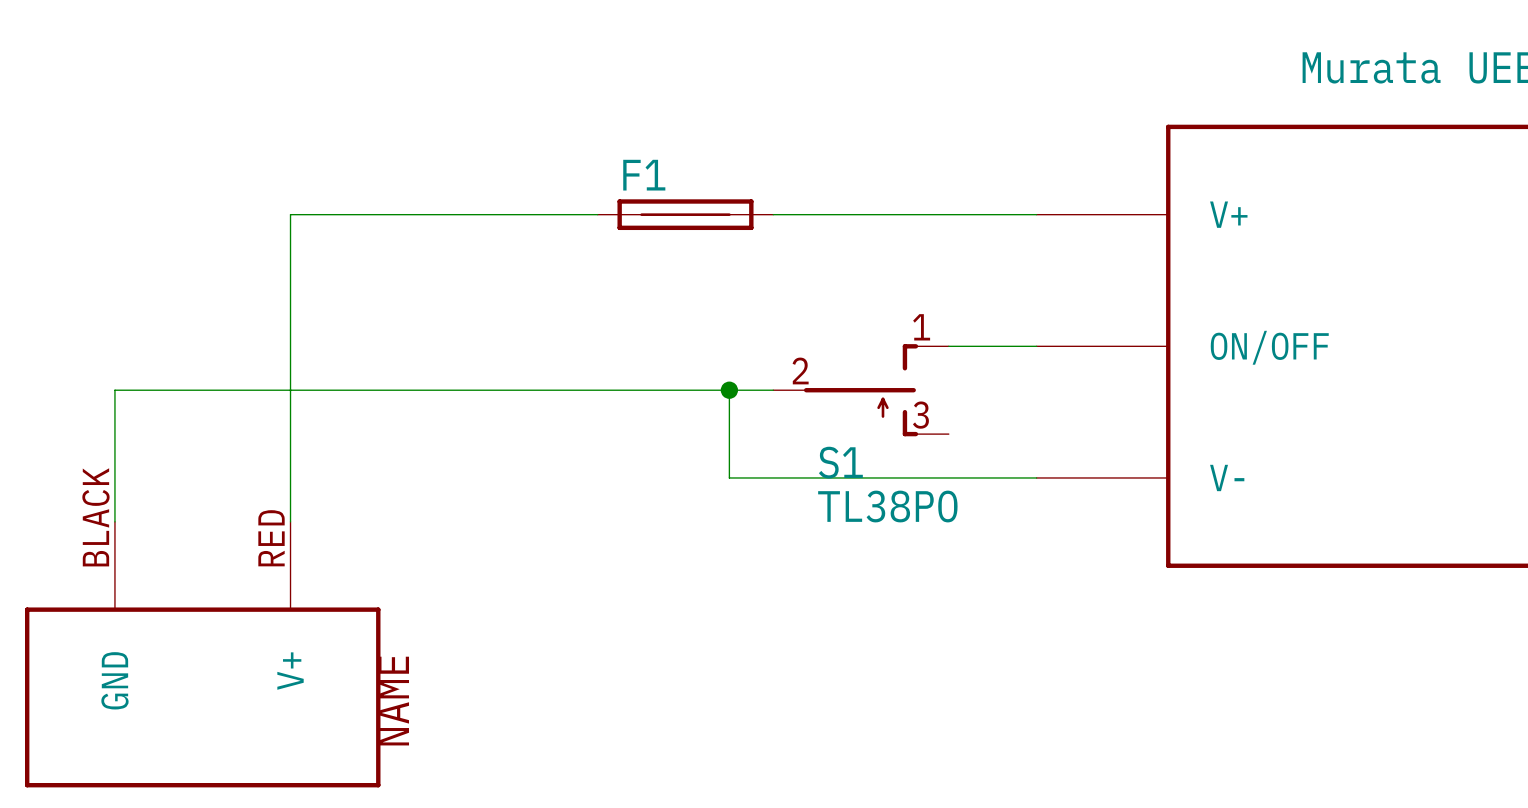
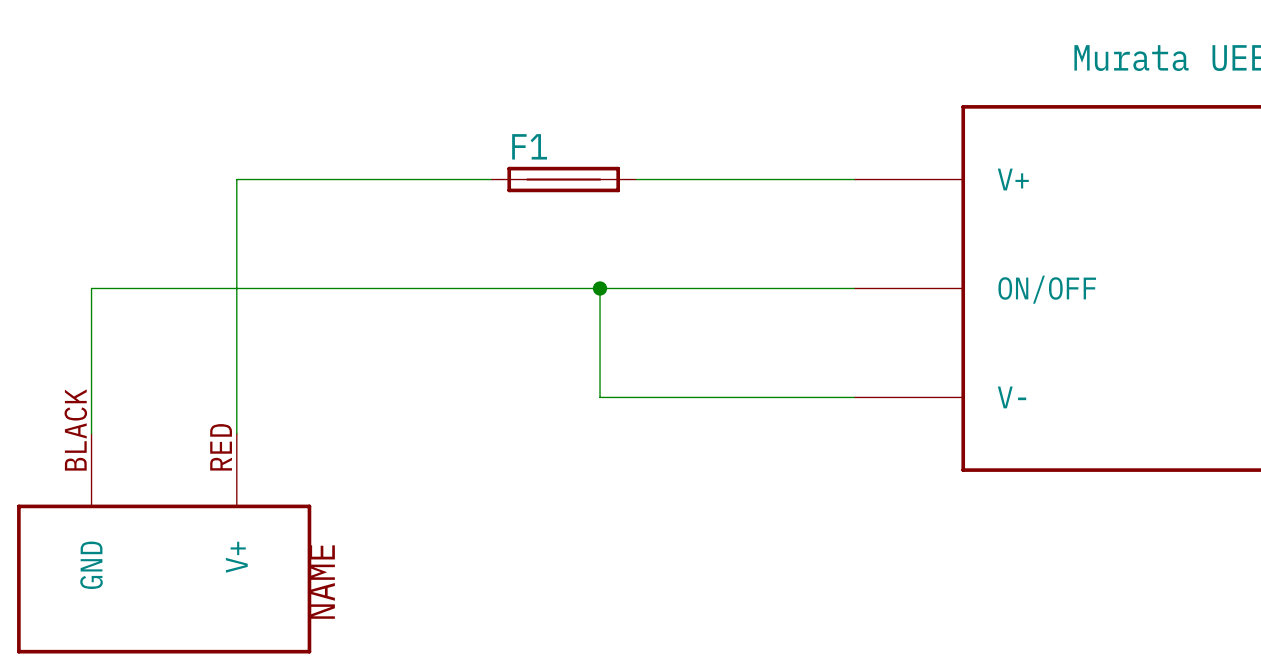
wire: none -> (600, 288) (600, 324)
wire: (114, 390) (773, 390) -> (91, 324) (91, 288) (781, 288)
junction position: (729, 390) -> (600, 288)
S1: TL38PO (861, 390) -> none

